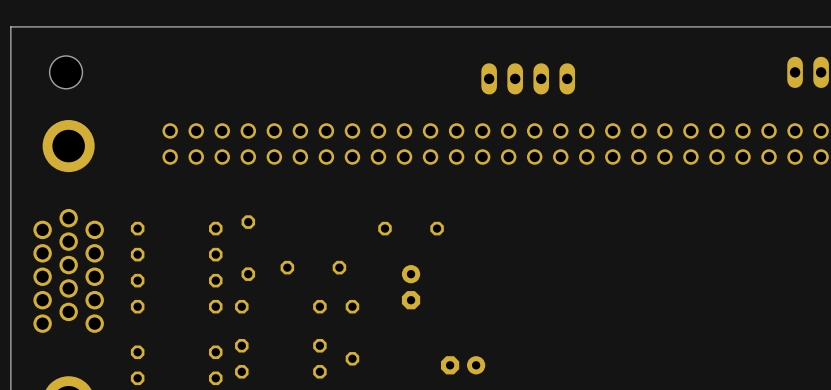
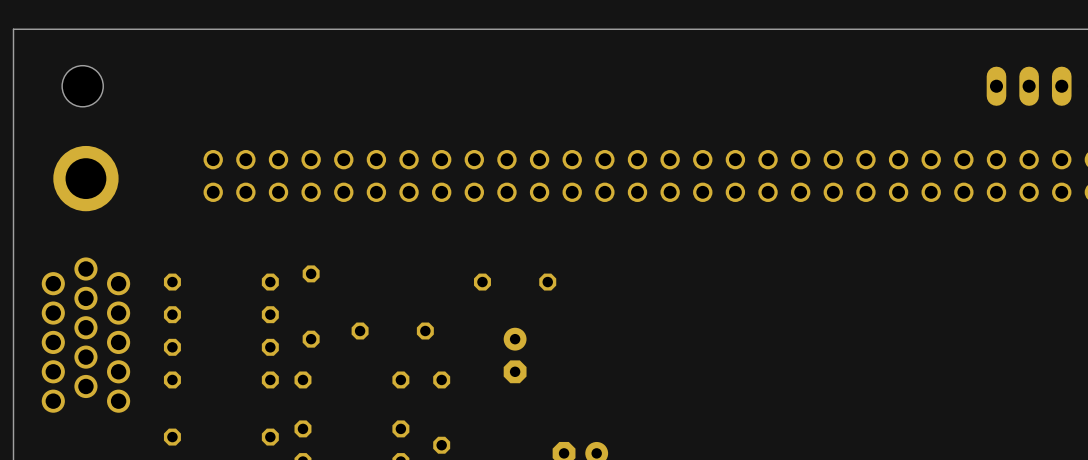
part: (528, 78) -> none

